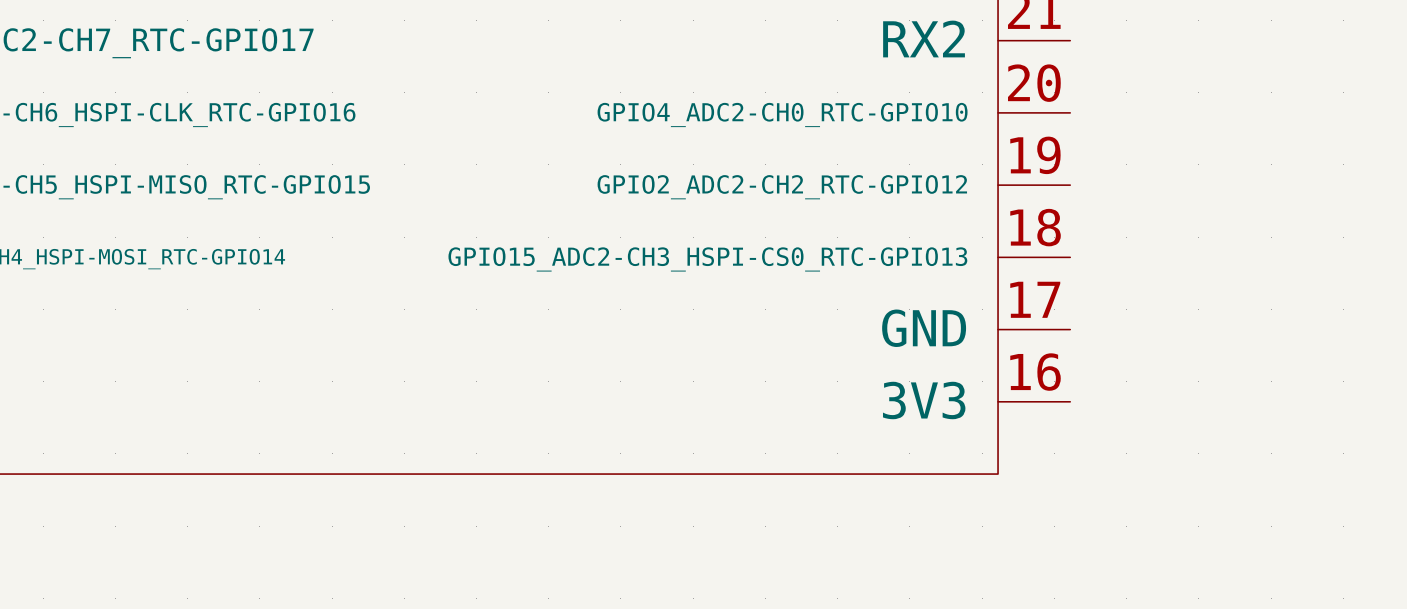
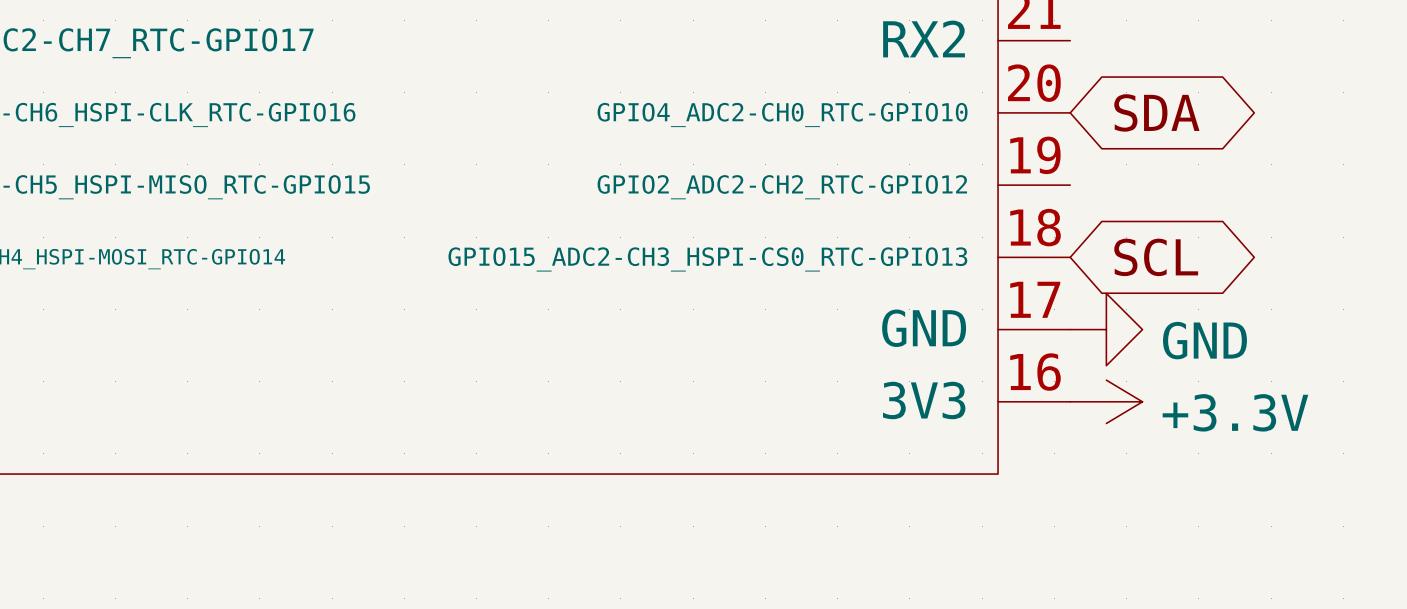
global label: none -> SDA (1156, 112)
global label: none -> SCL (1156, 257)
power symbol: none -> GND (1106, 329)
power symbol: none -> +3.3V (1106, 401)

